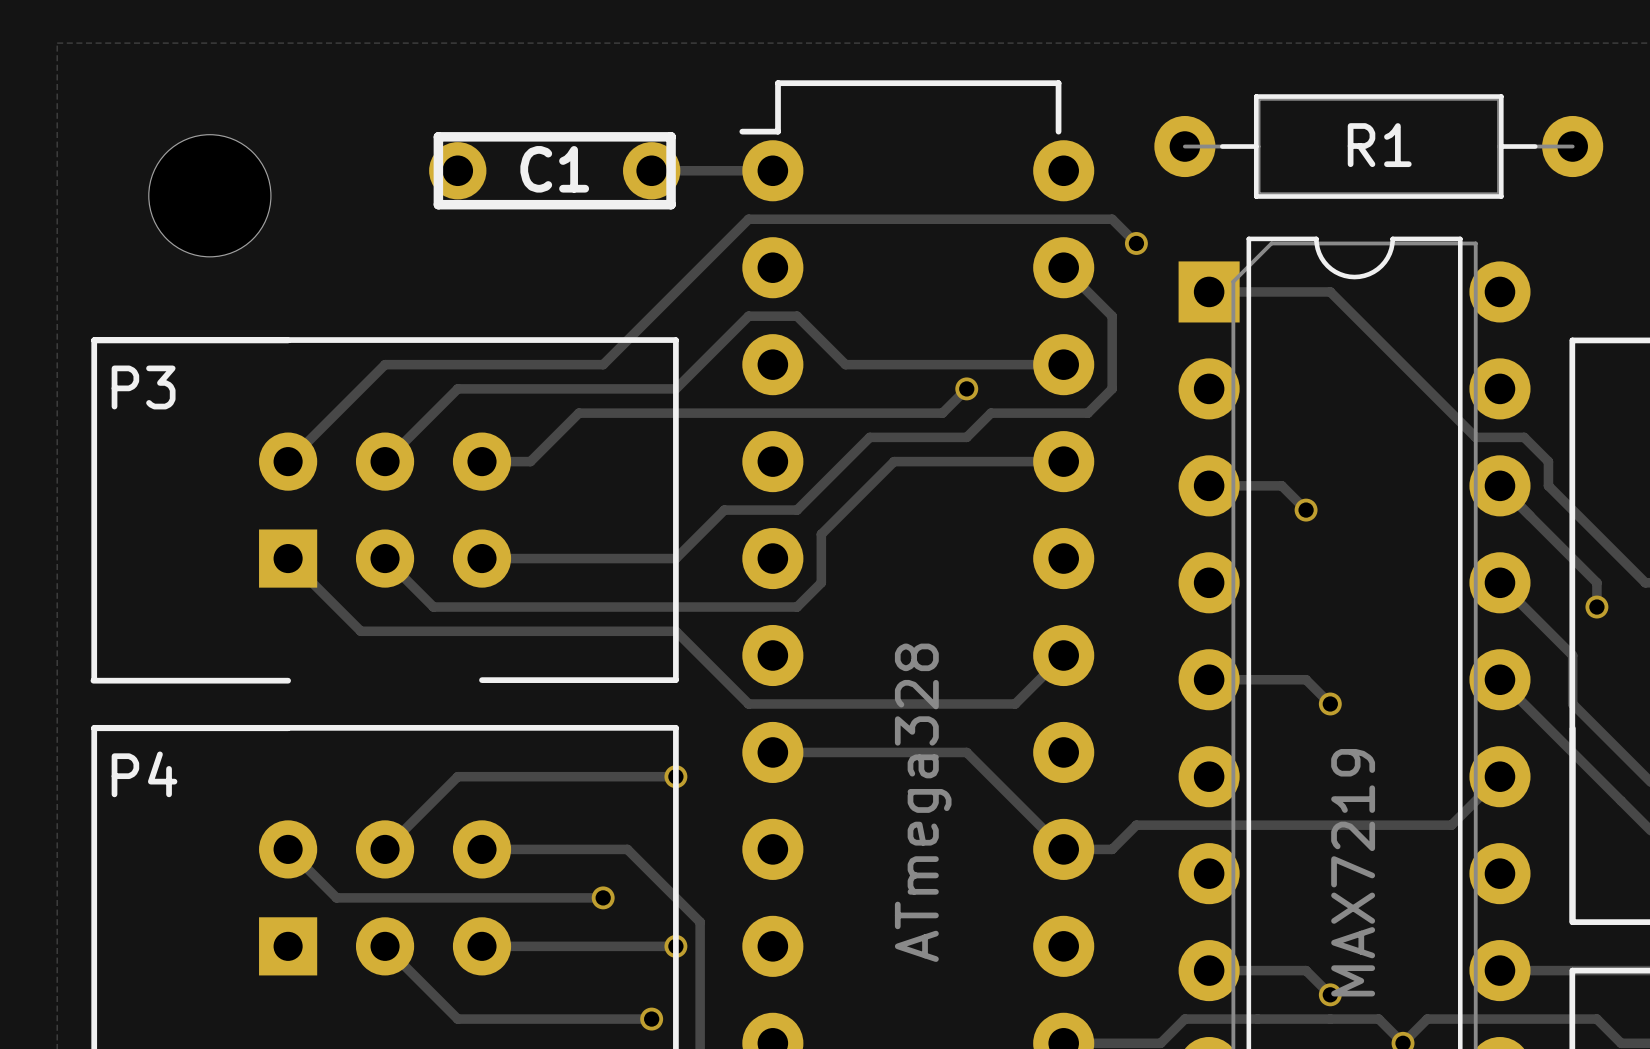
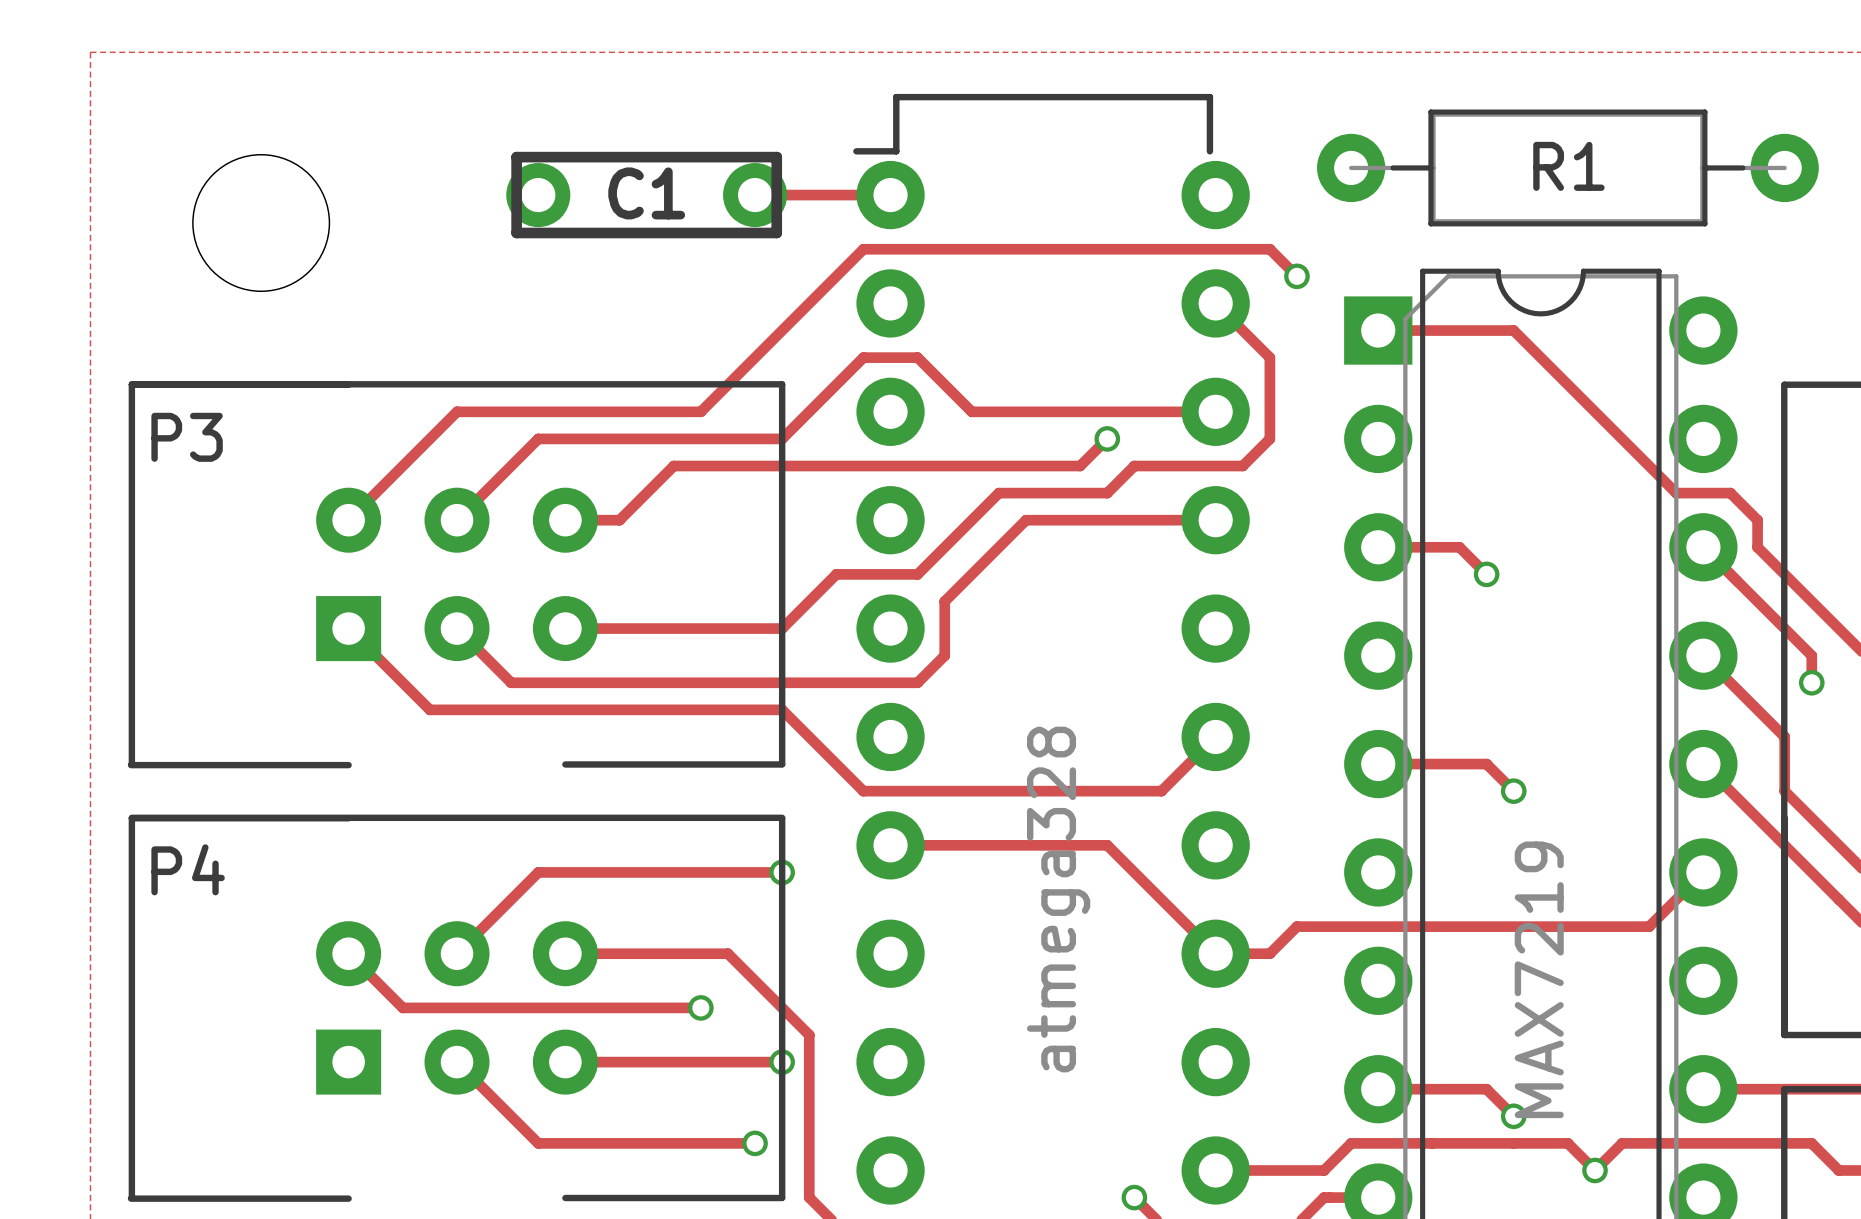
part value: ATmega328 (923, 802) -> atmega328 (1058, 899)

